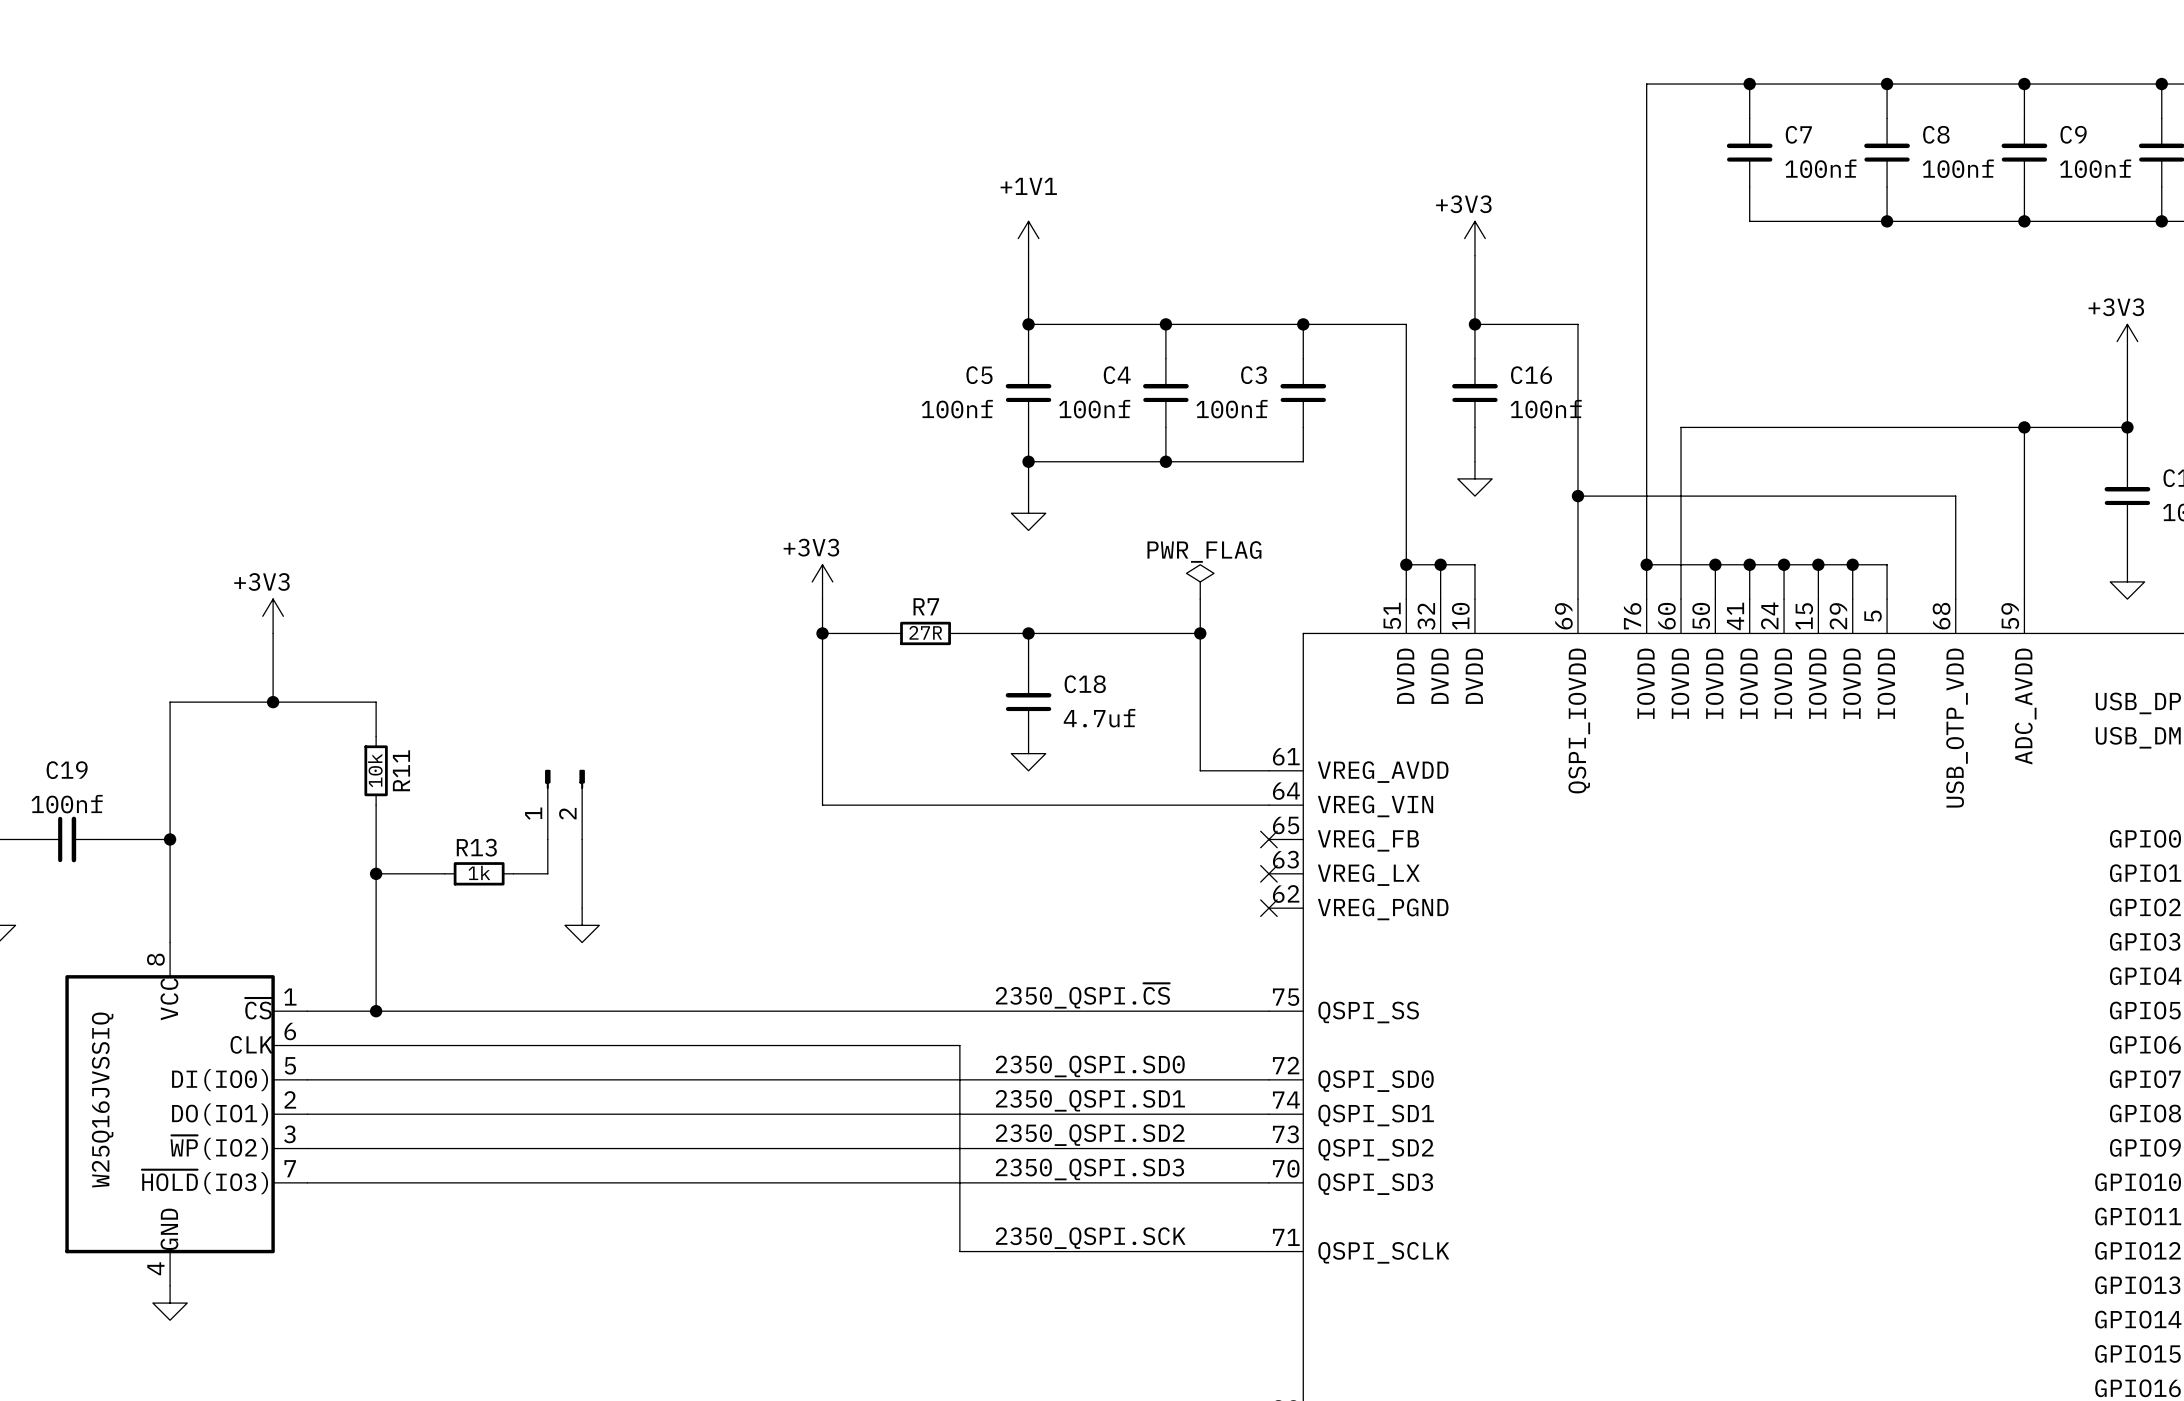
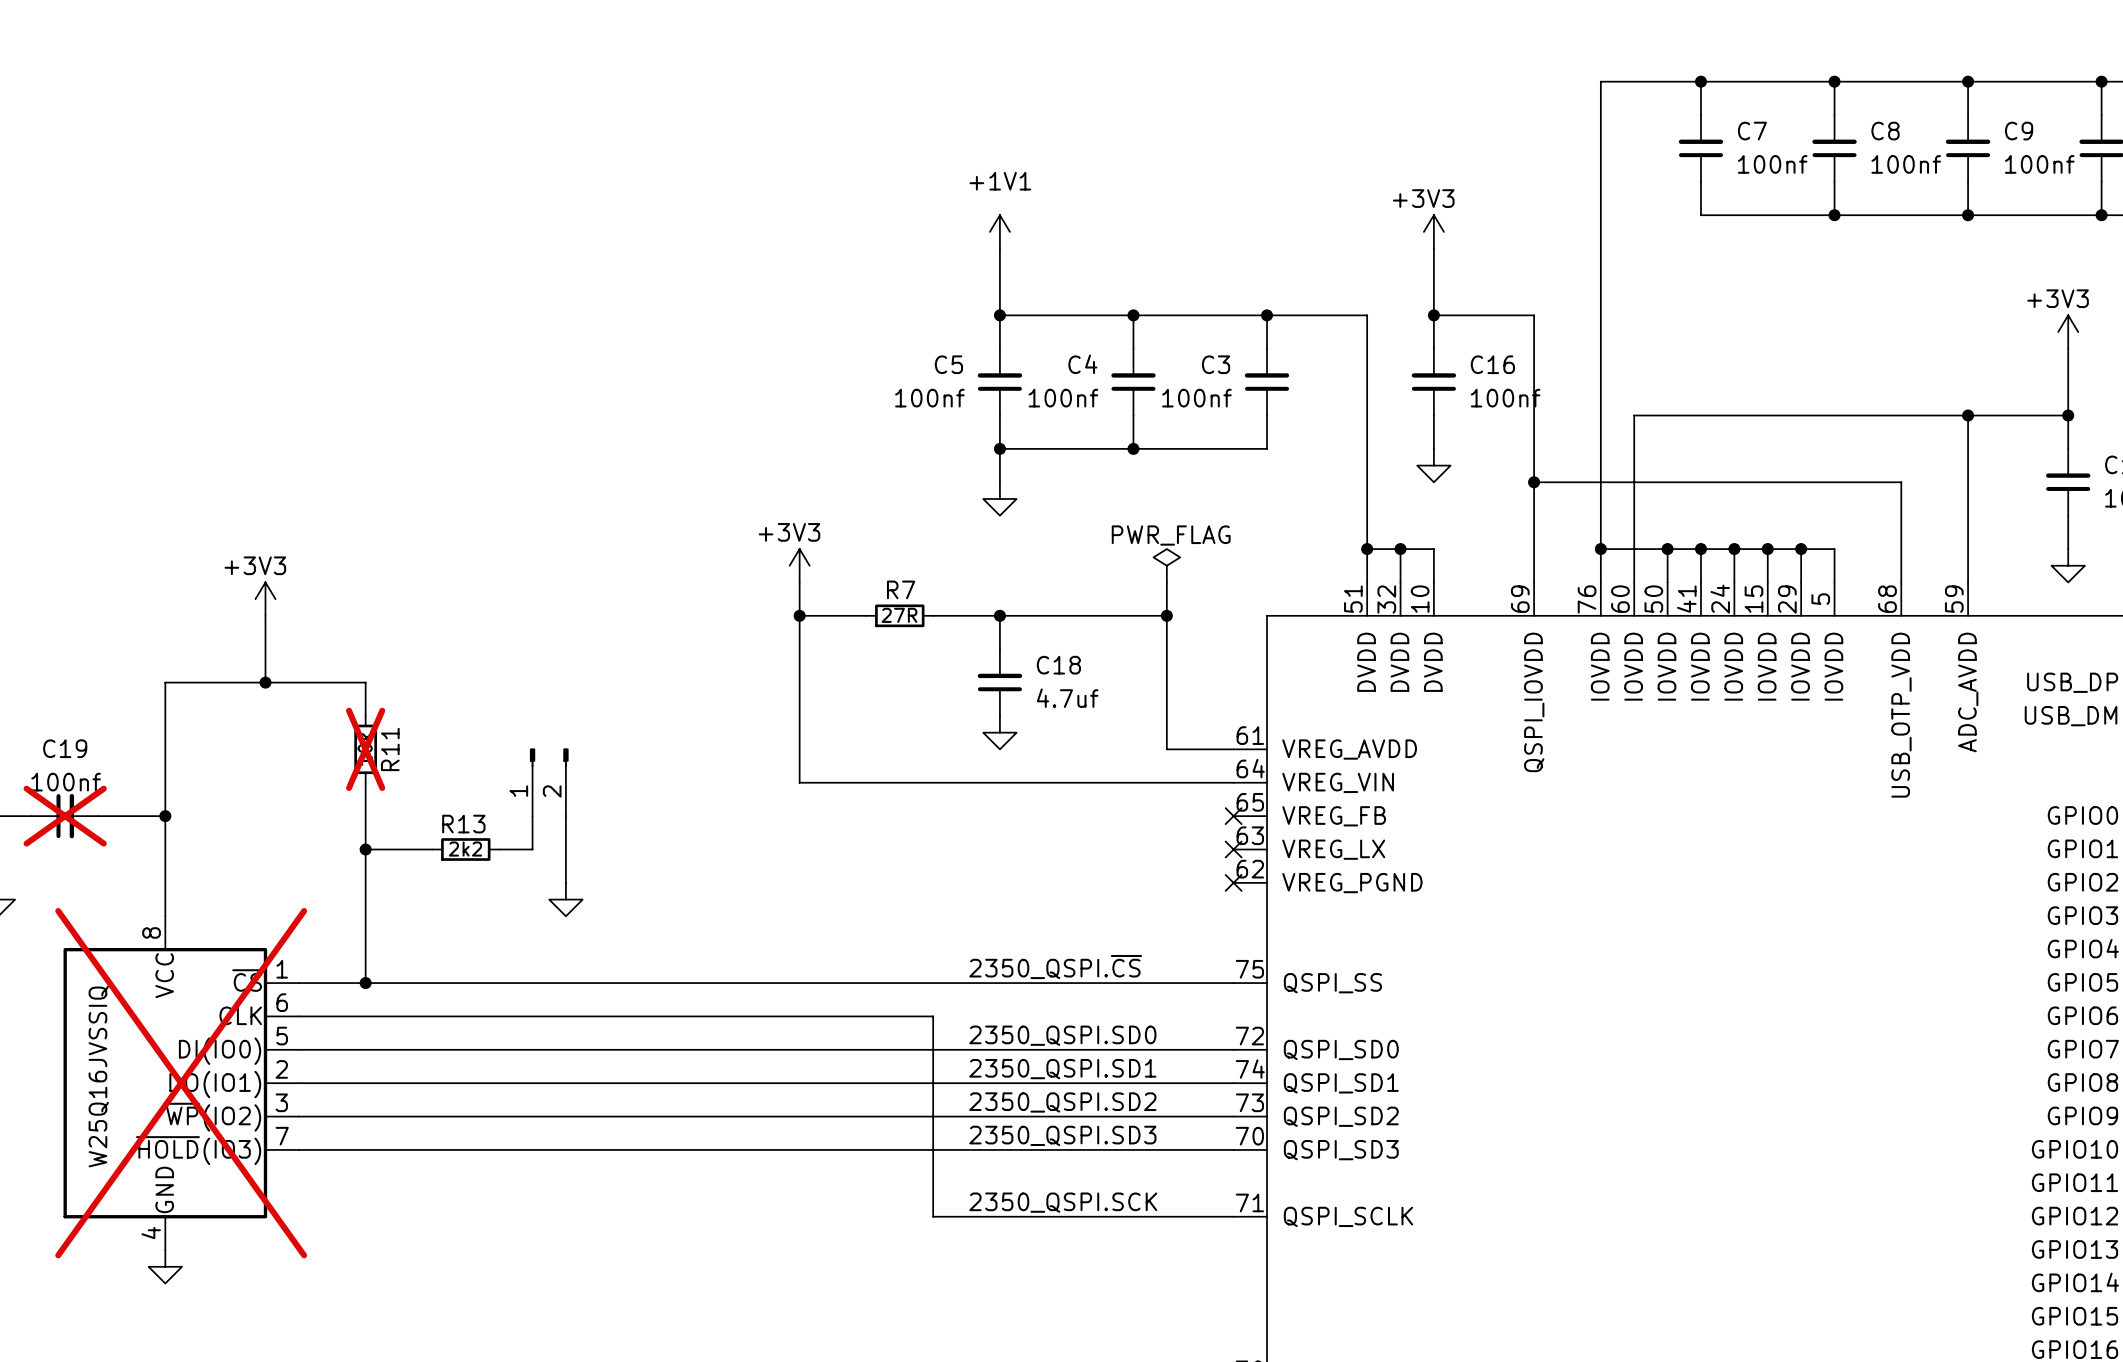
R11 do-not-place cross: none -> (365, 749)
C19 do-not-place cross: none -> (65, 816)
R13 value: 1k (479, 872) -> 2k2 (465, 849)
part do-not-place cross: none -> (181, 1083)

